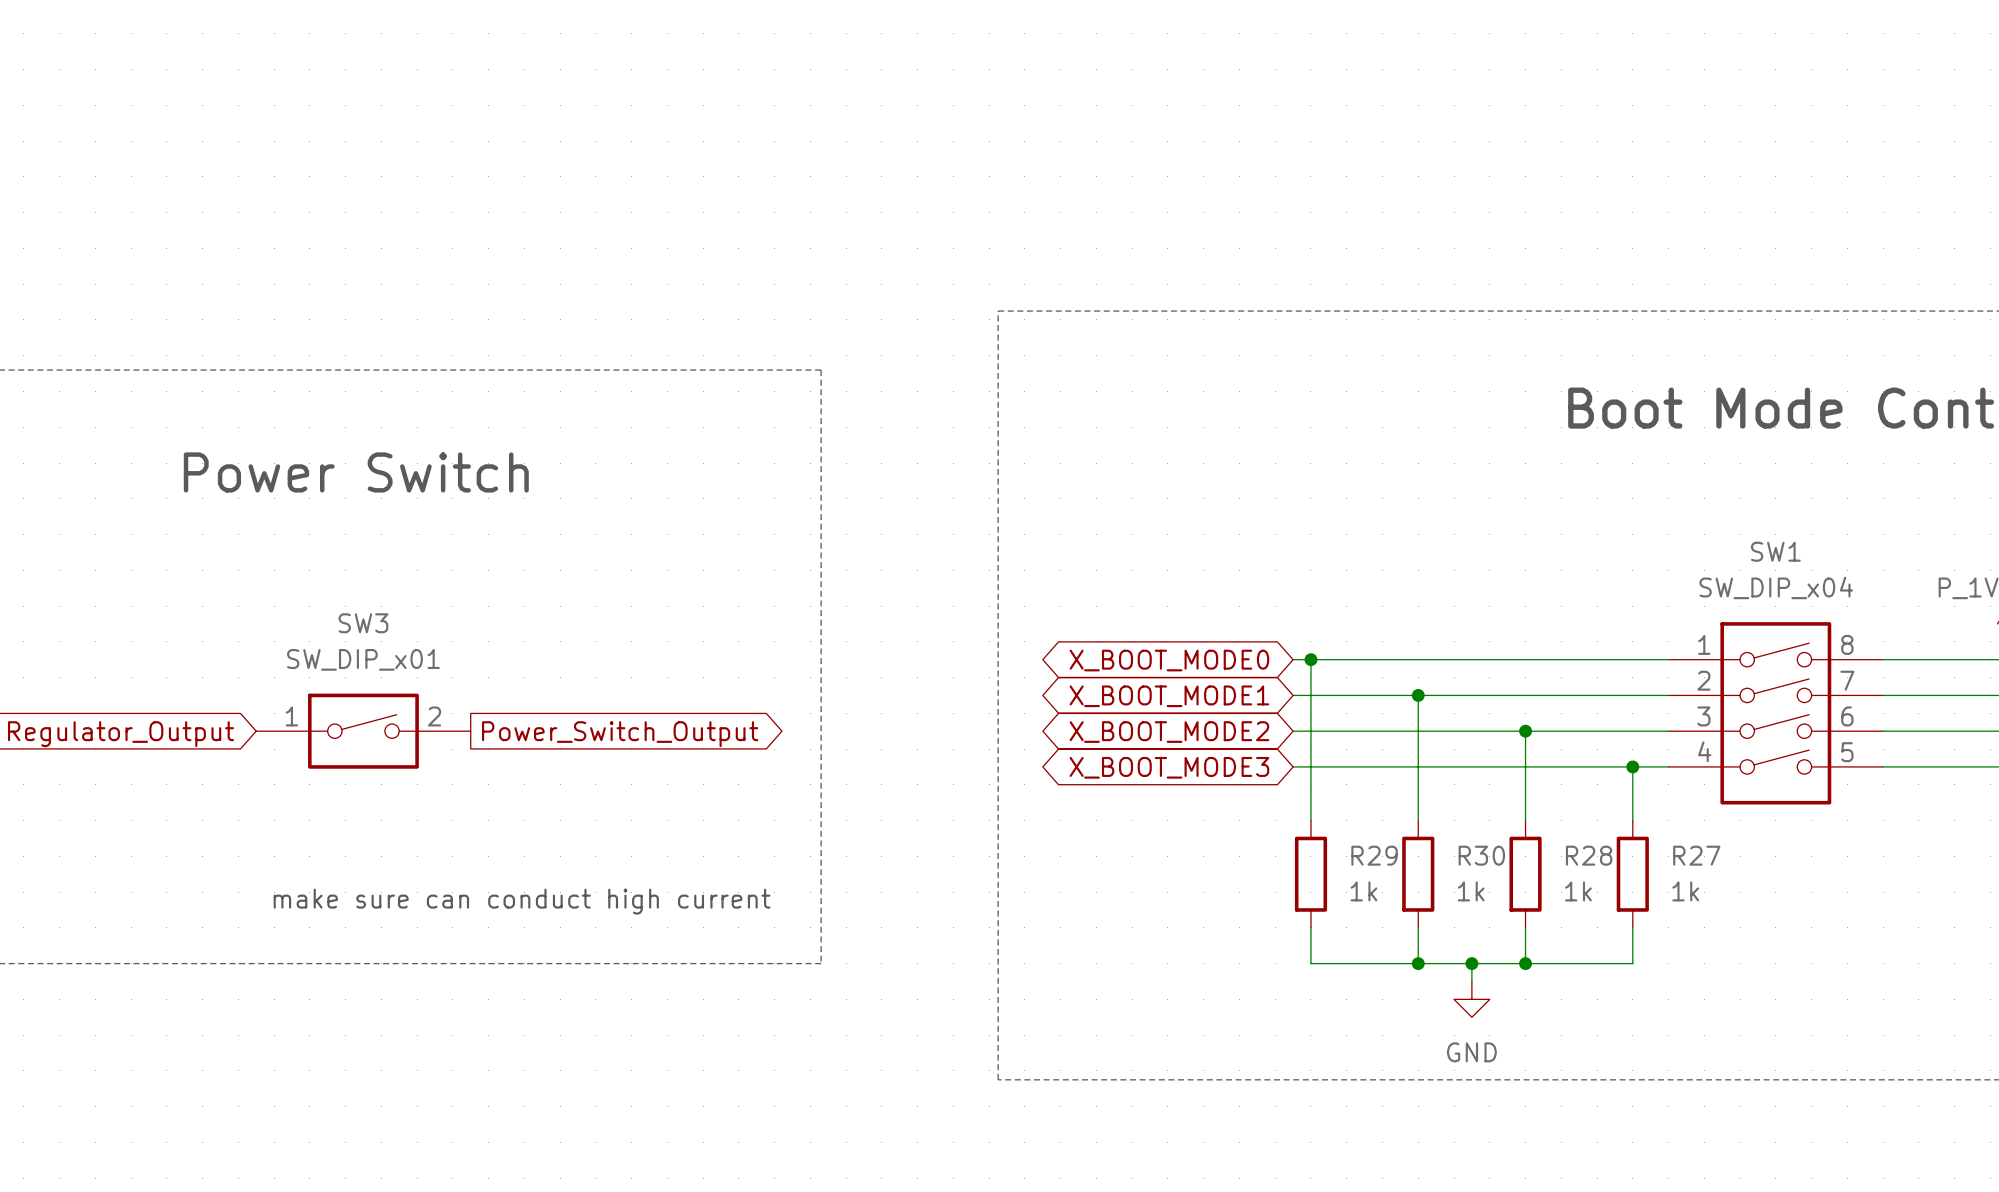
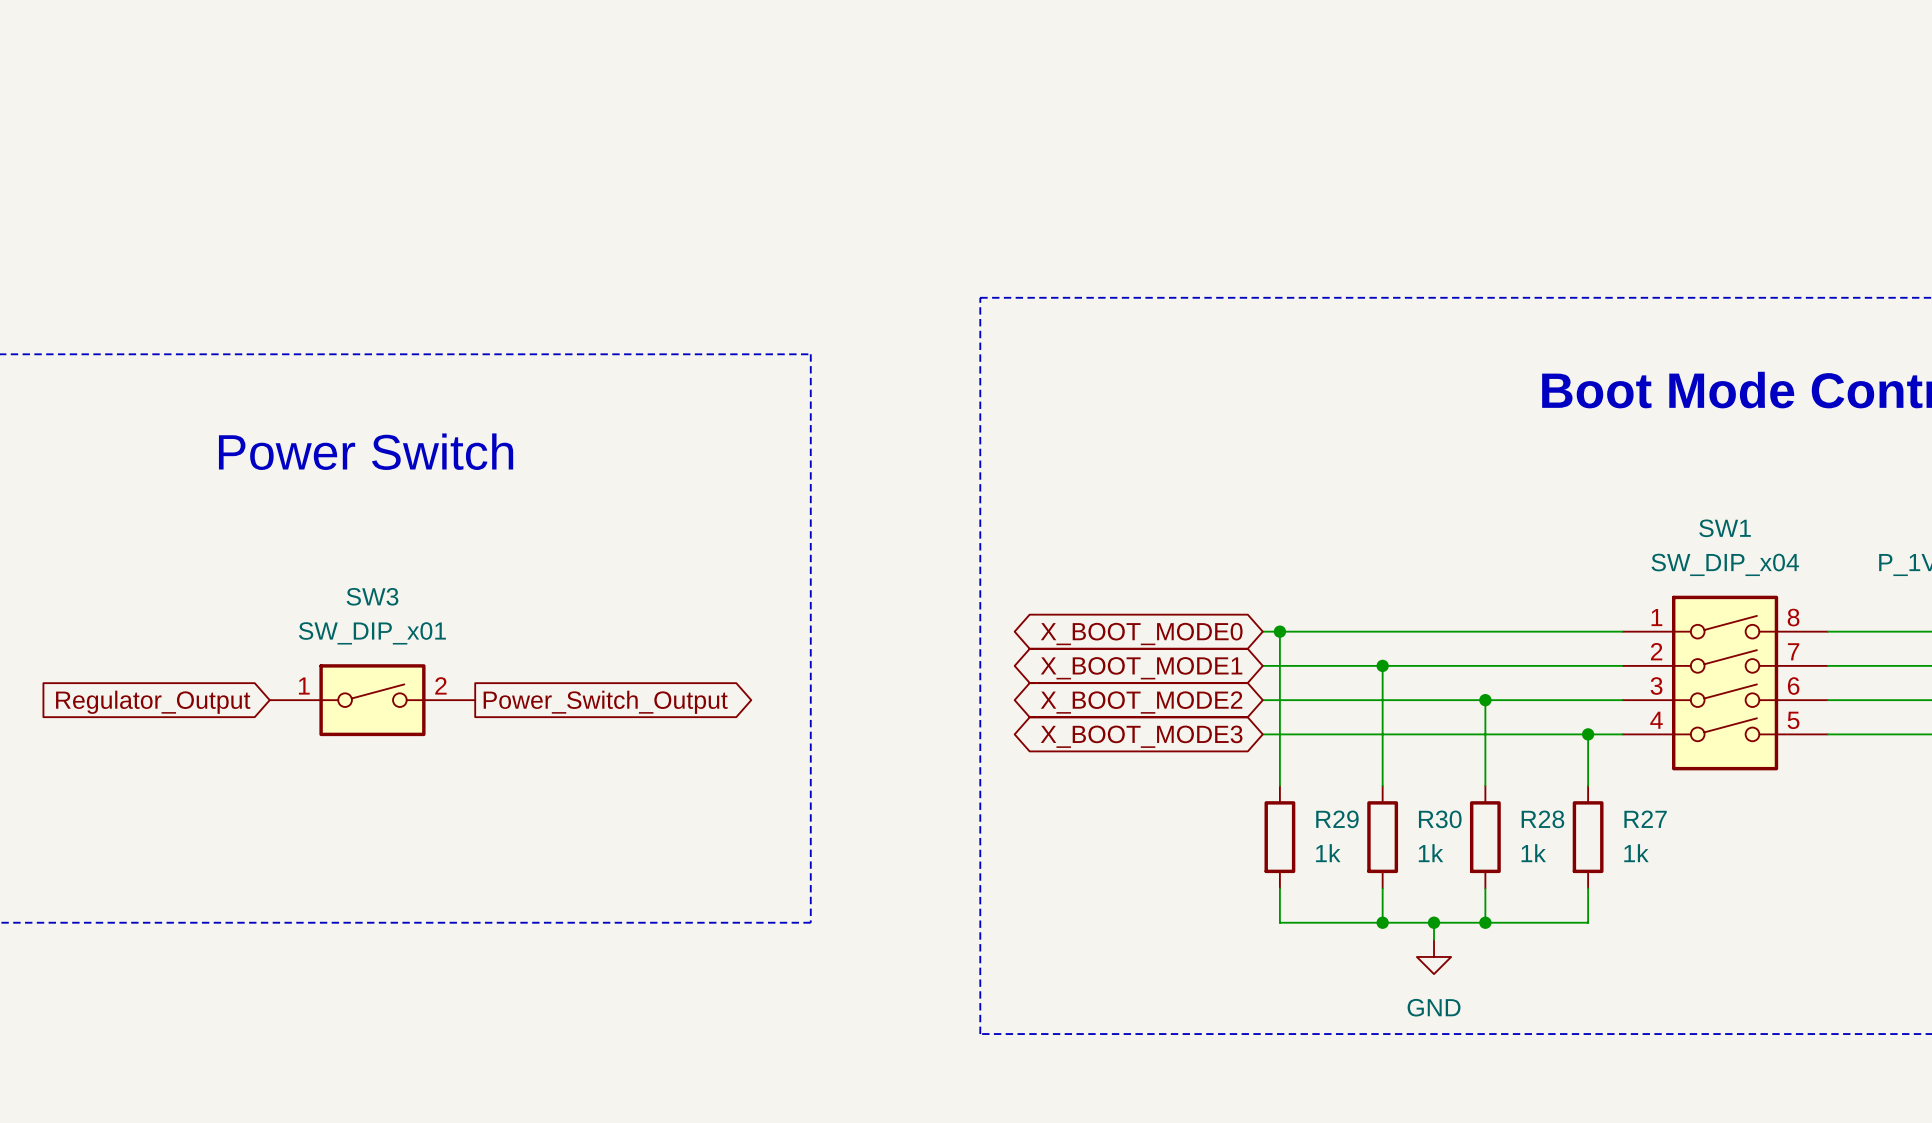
text: make sure can conduct high current (522, 901) -> none

